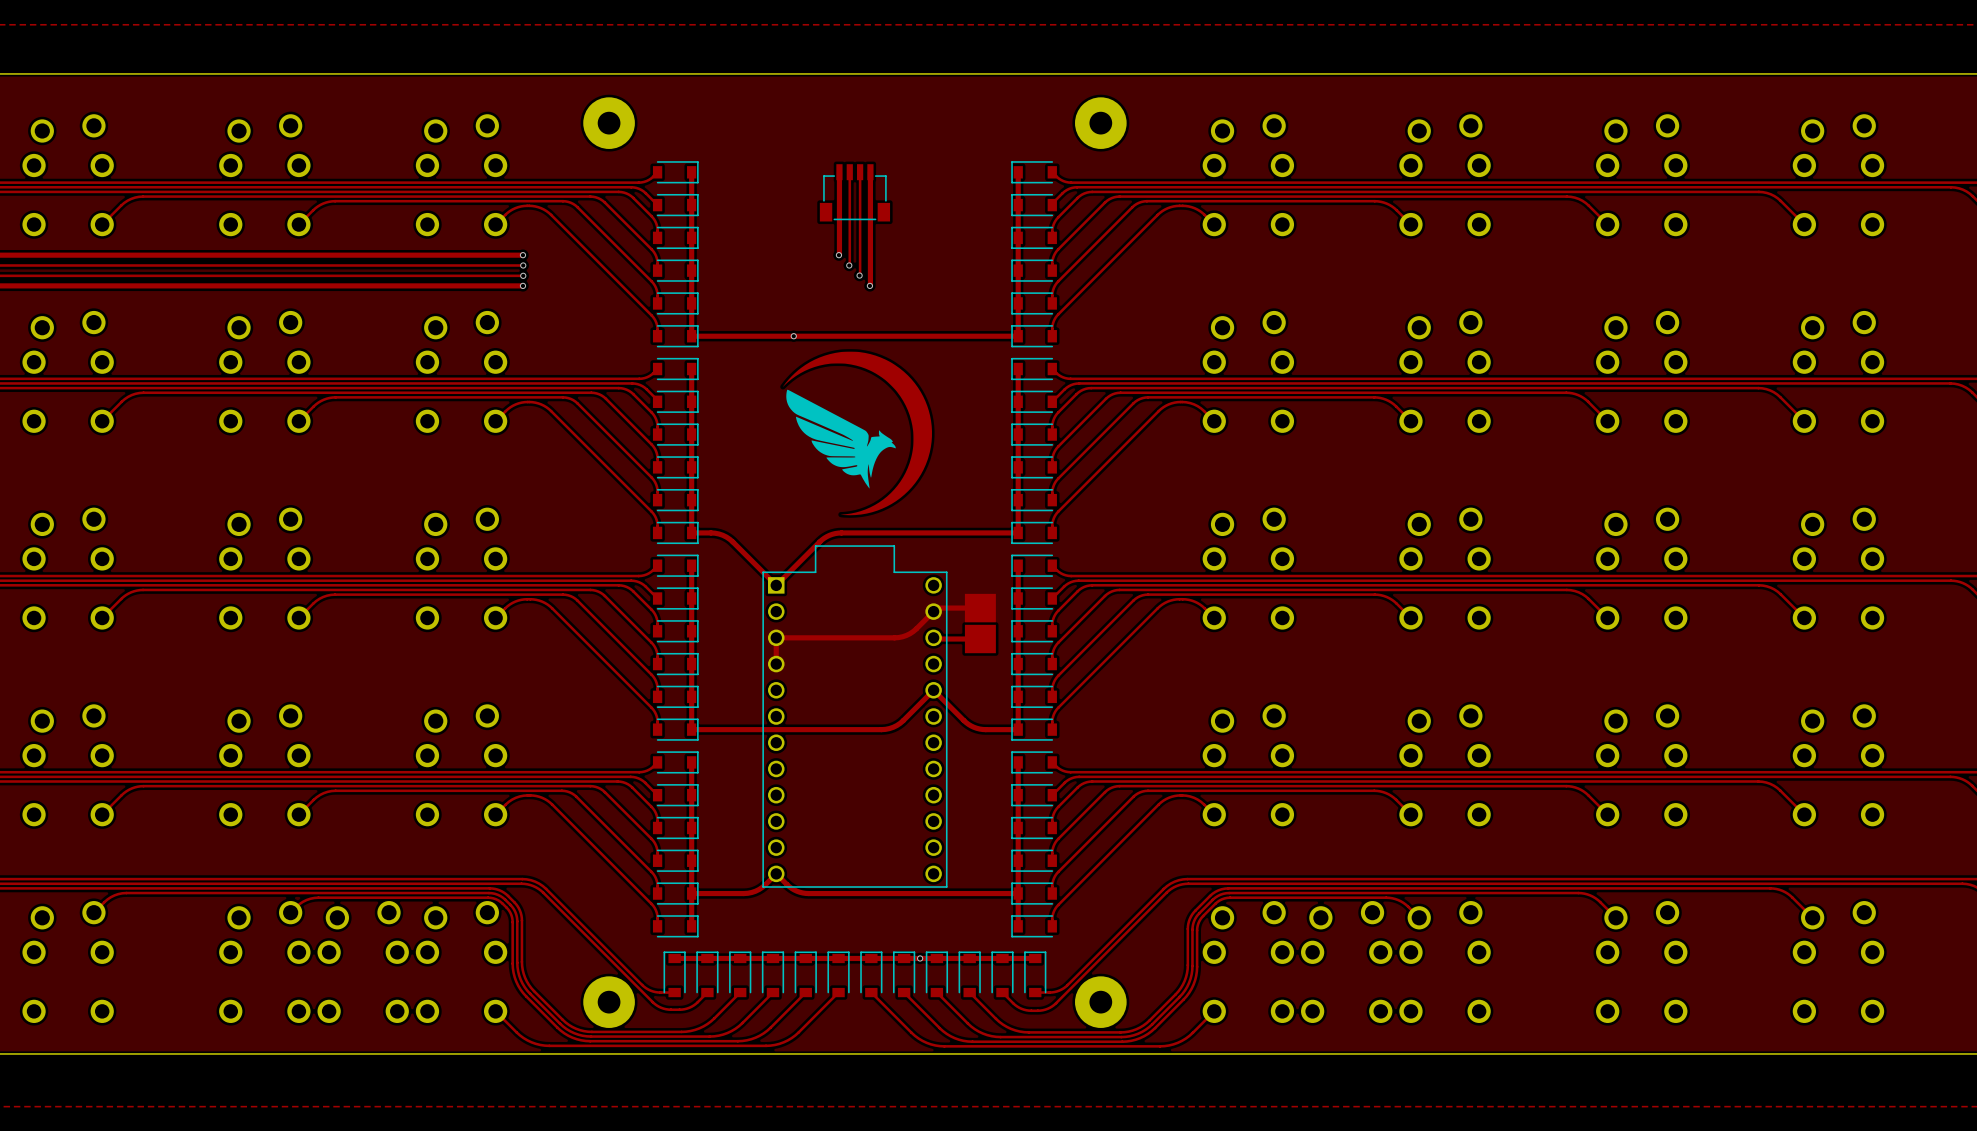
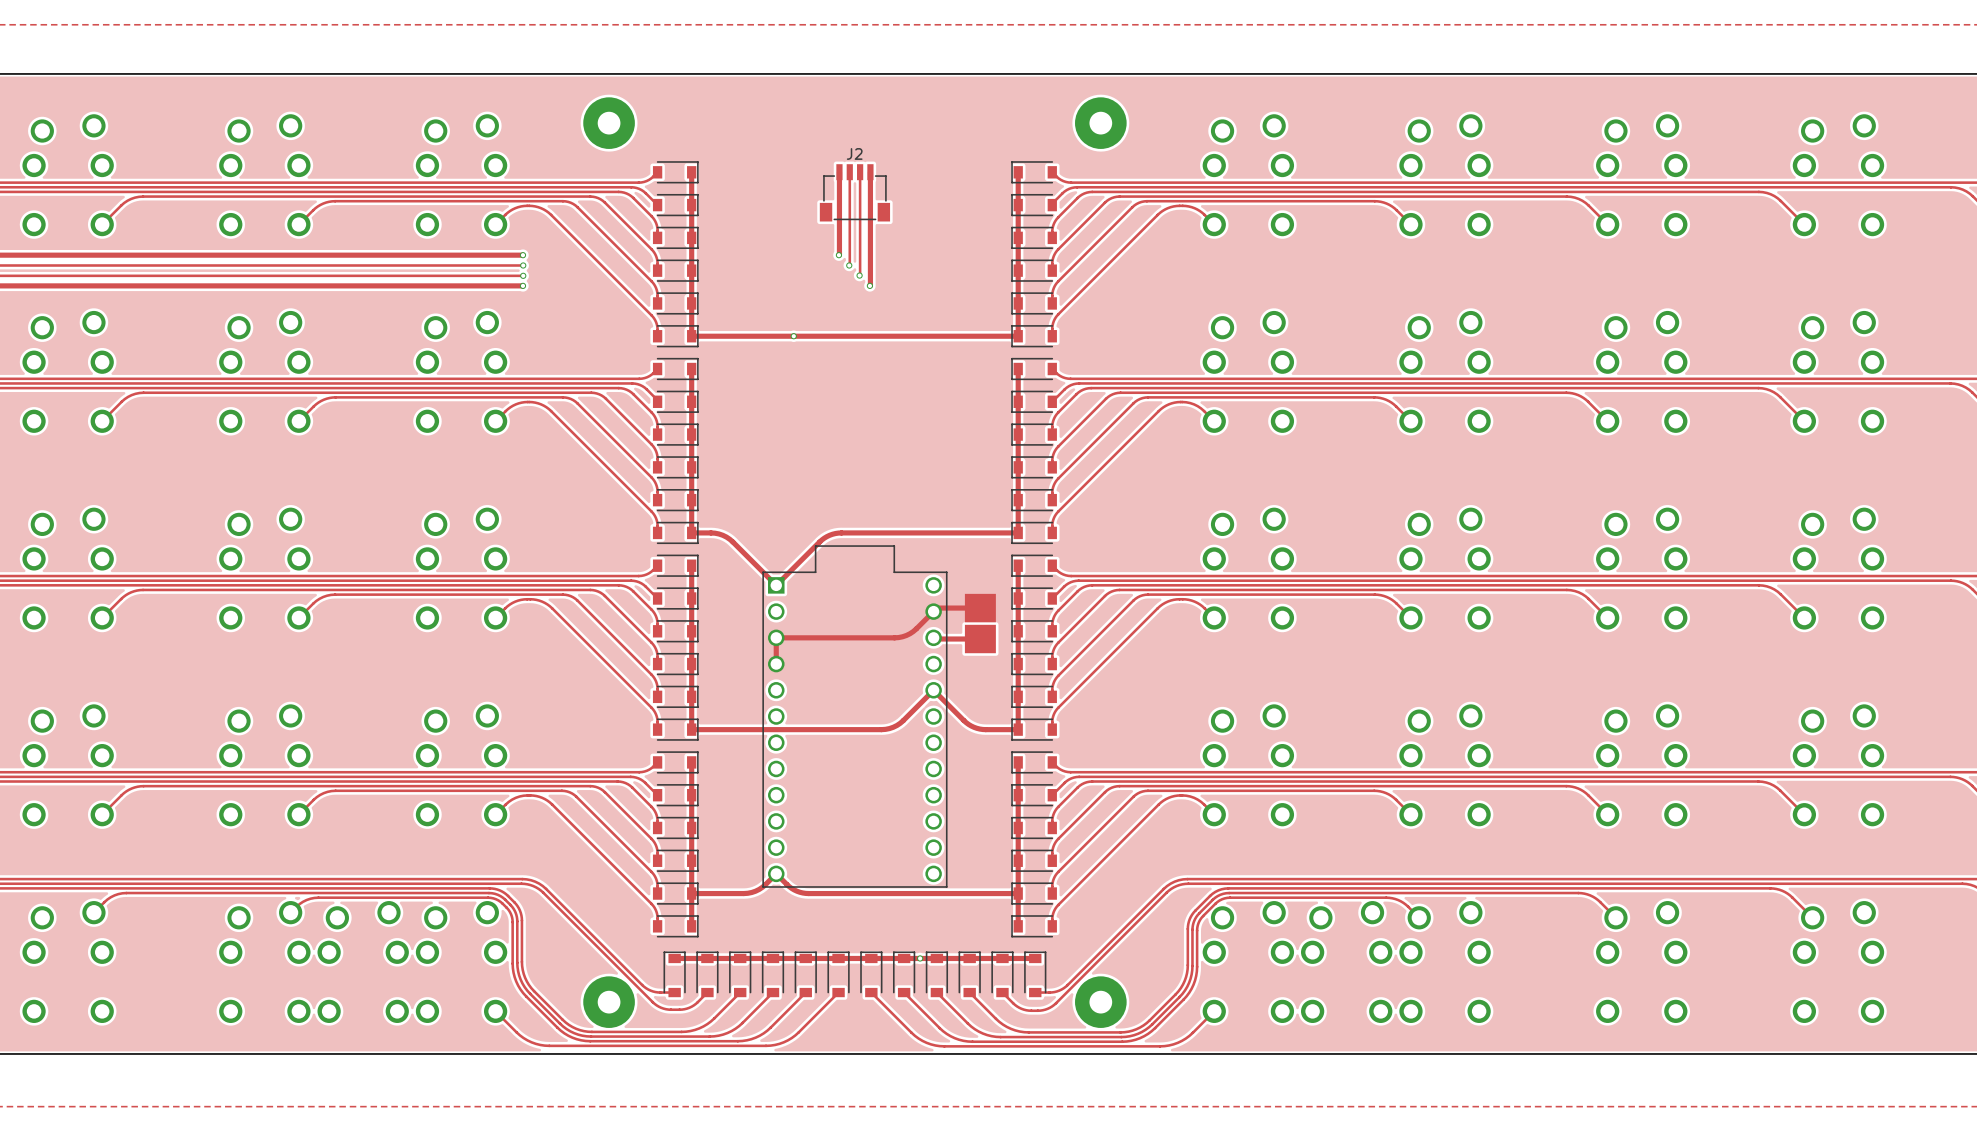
J2 name: none -> J2 (854, 153)
drawing: [782, 351, 932, 516] -> none

